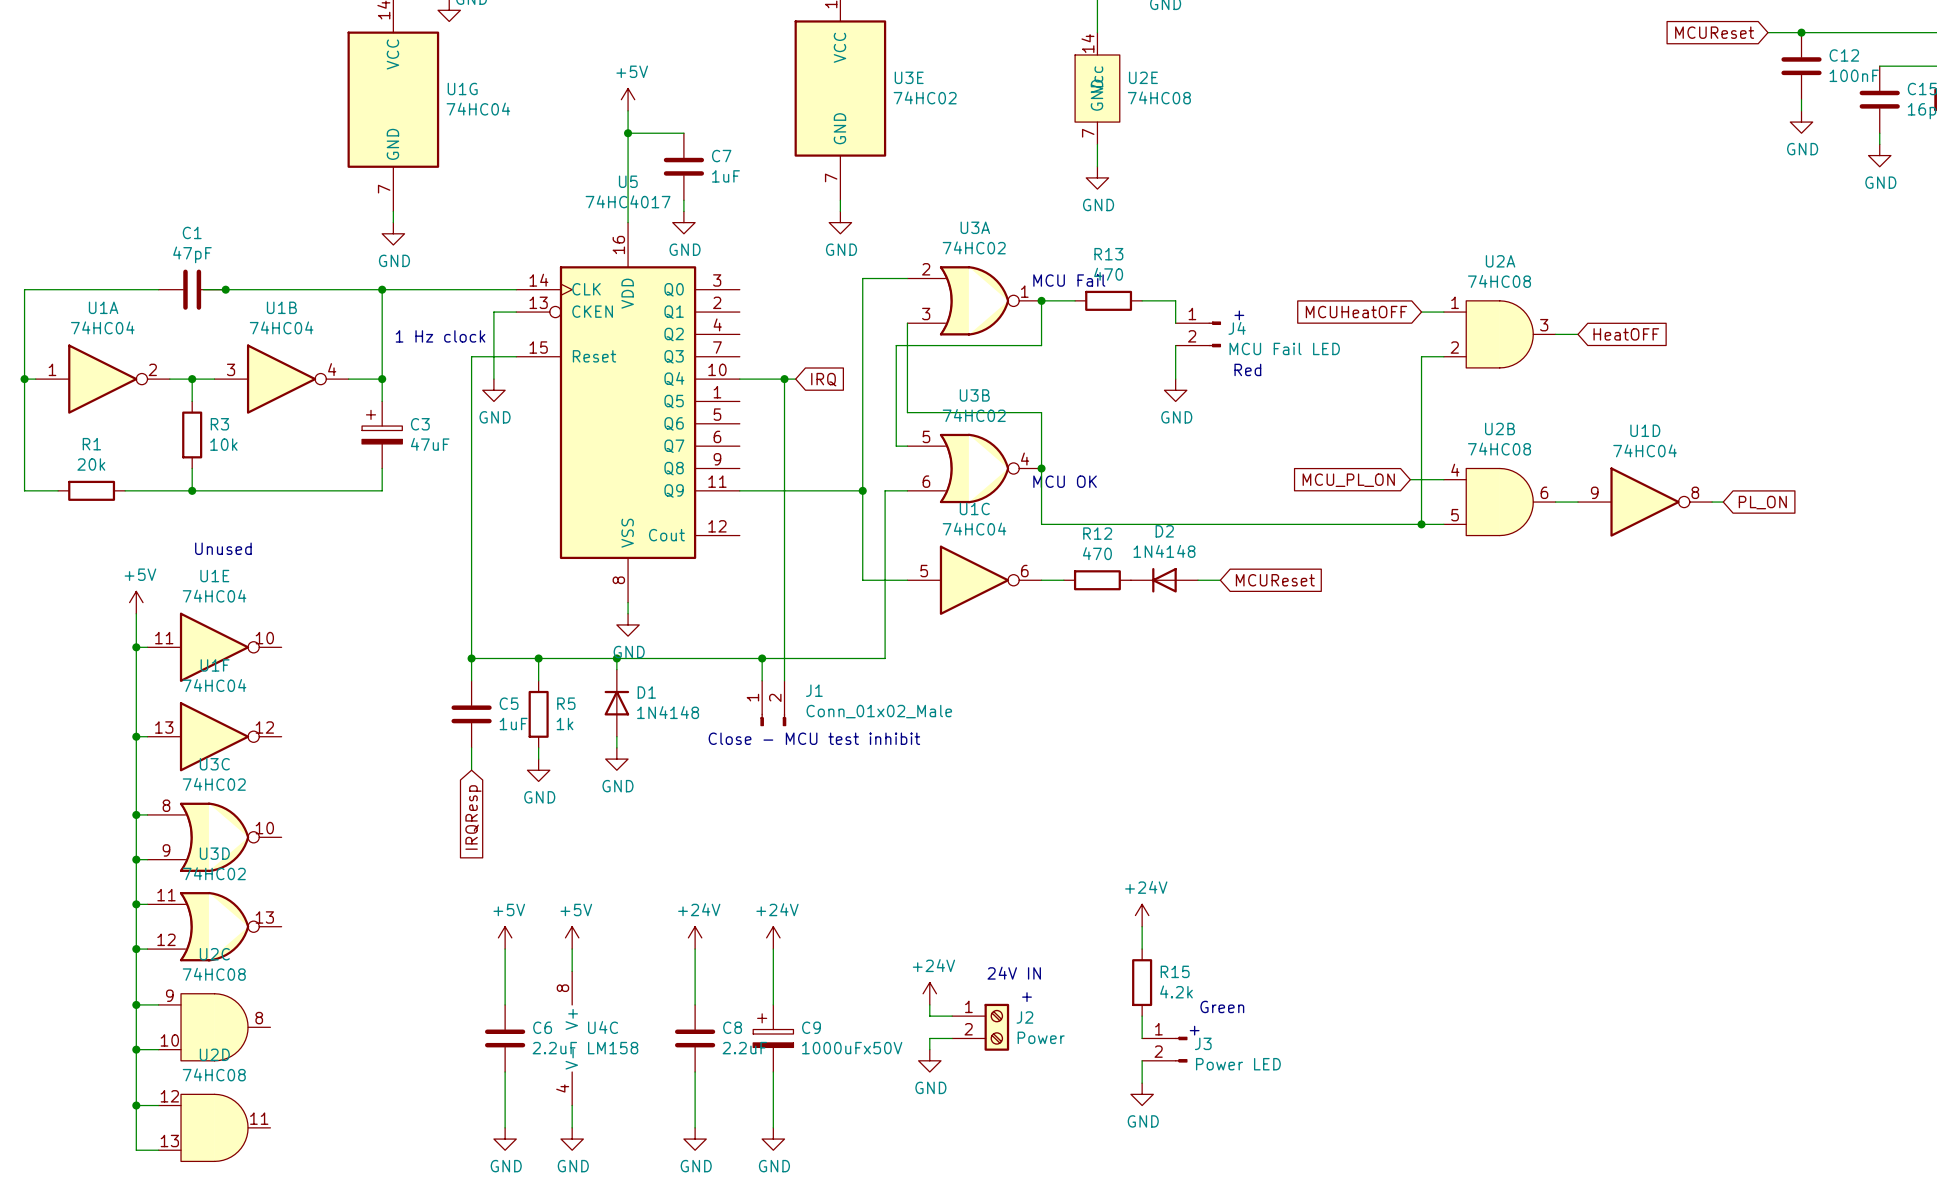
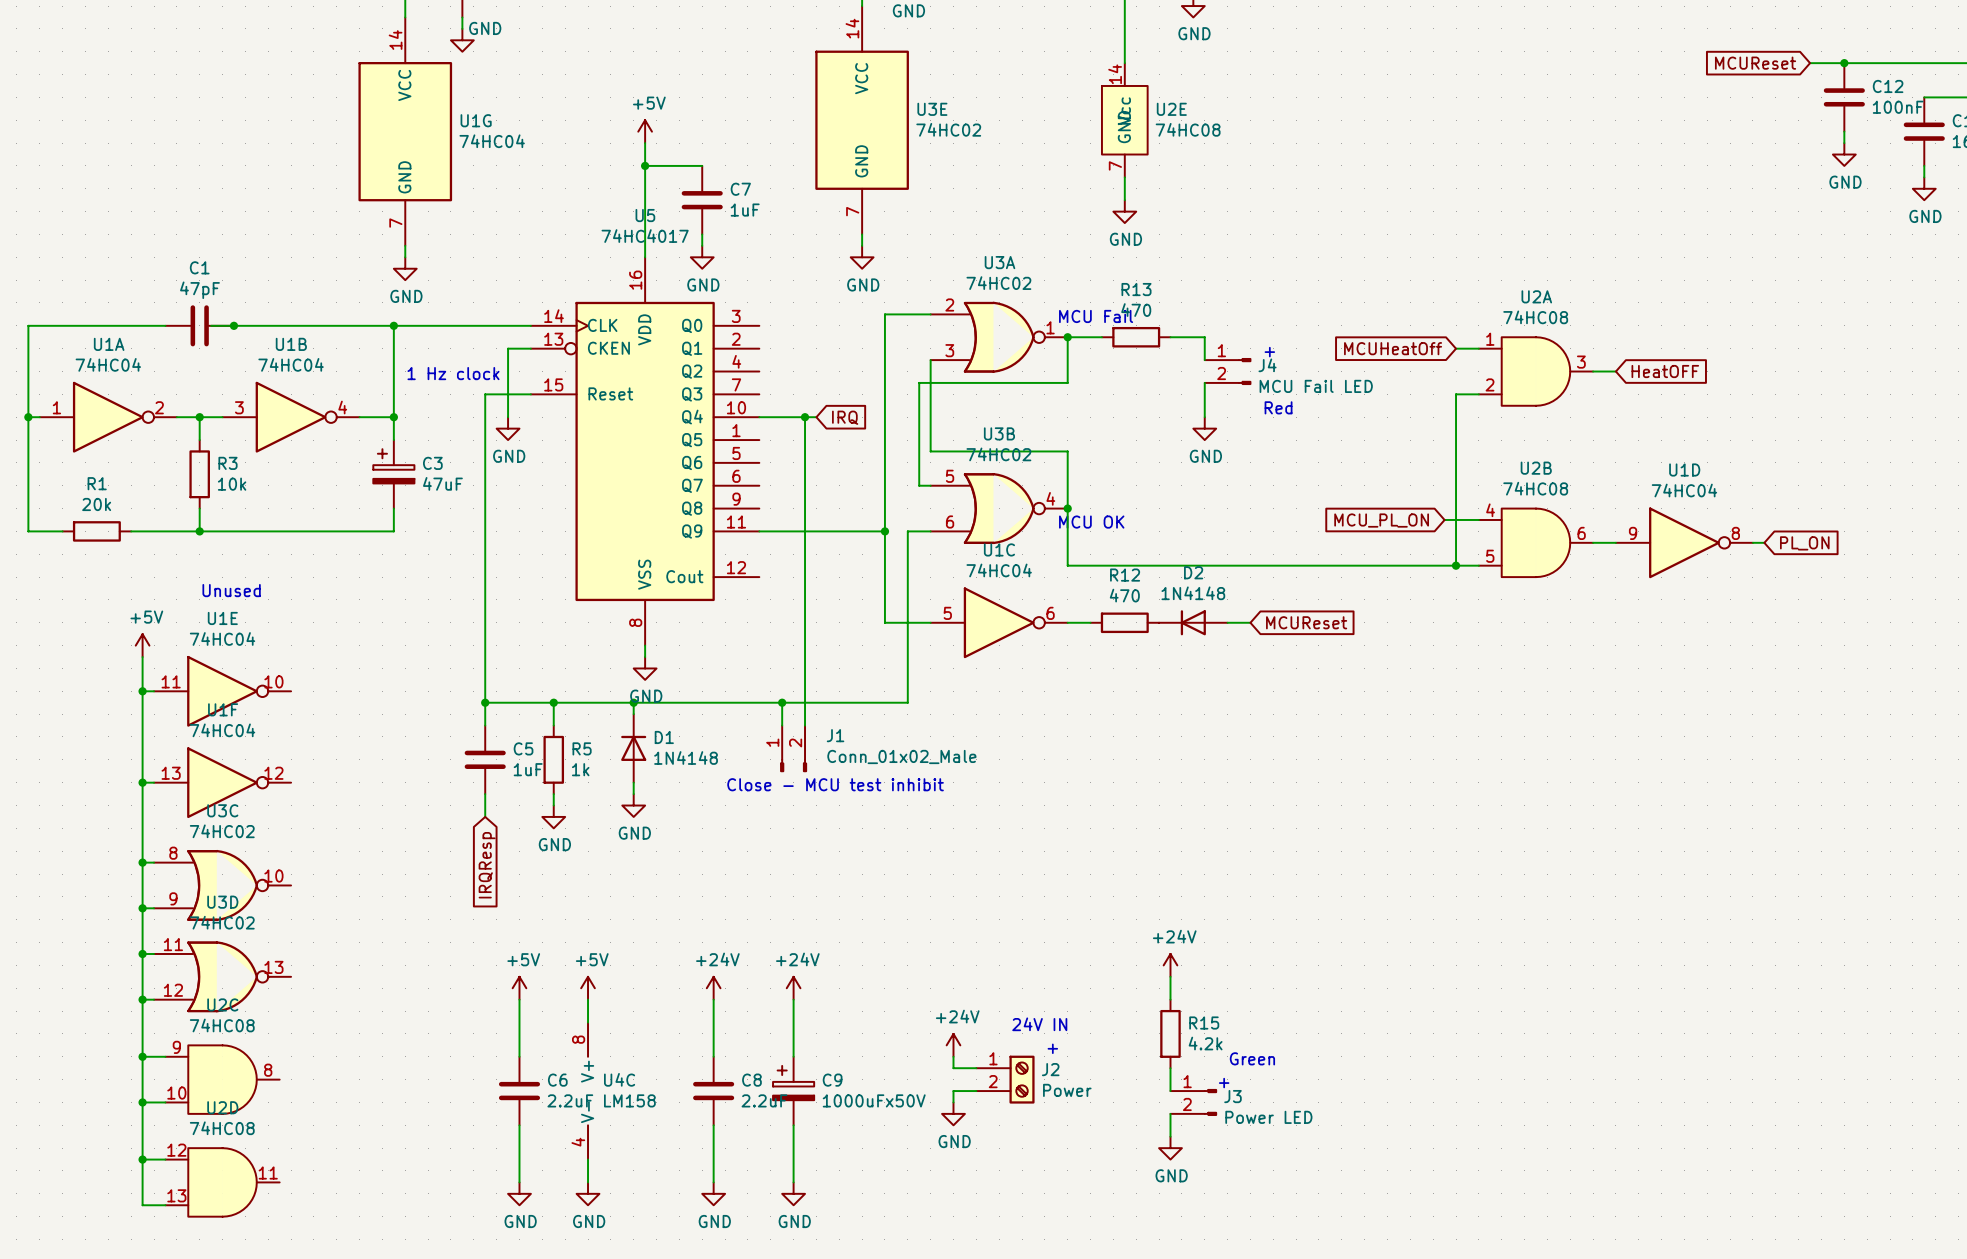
global label: MCUHeatOFF (1356, 312) -> MCUHeatOff (1393, 348)

